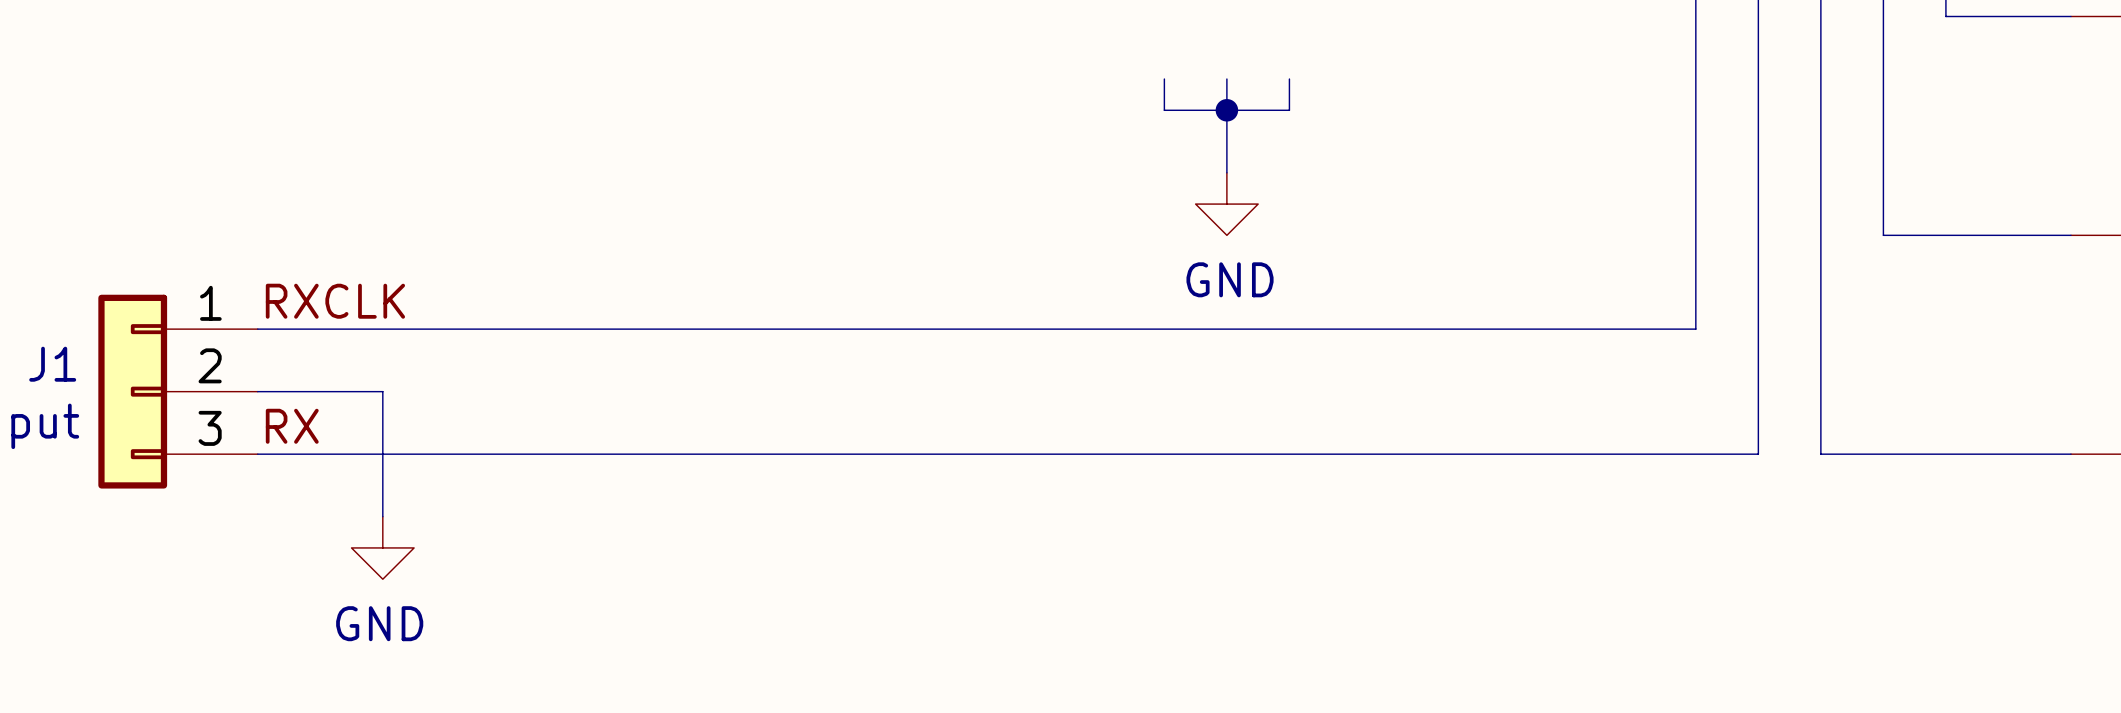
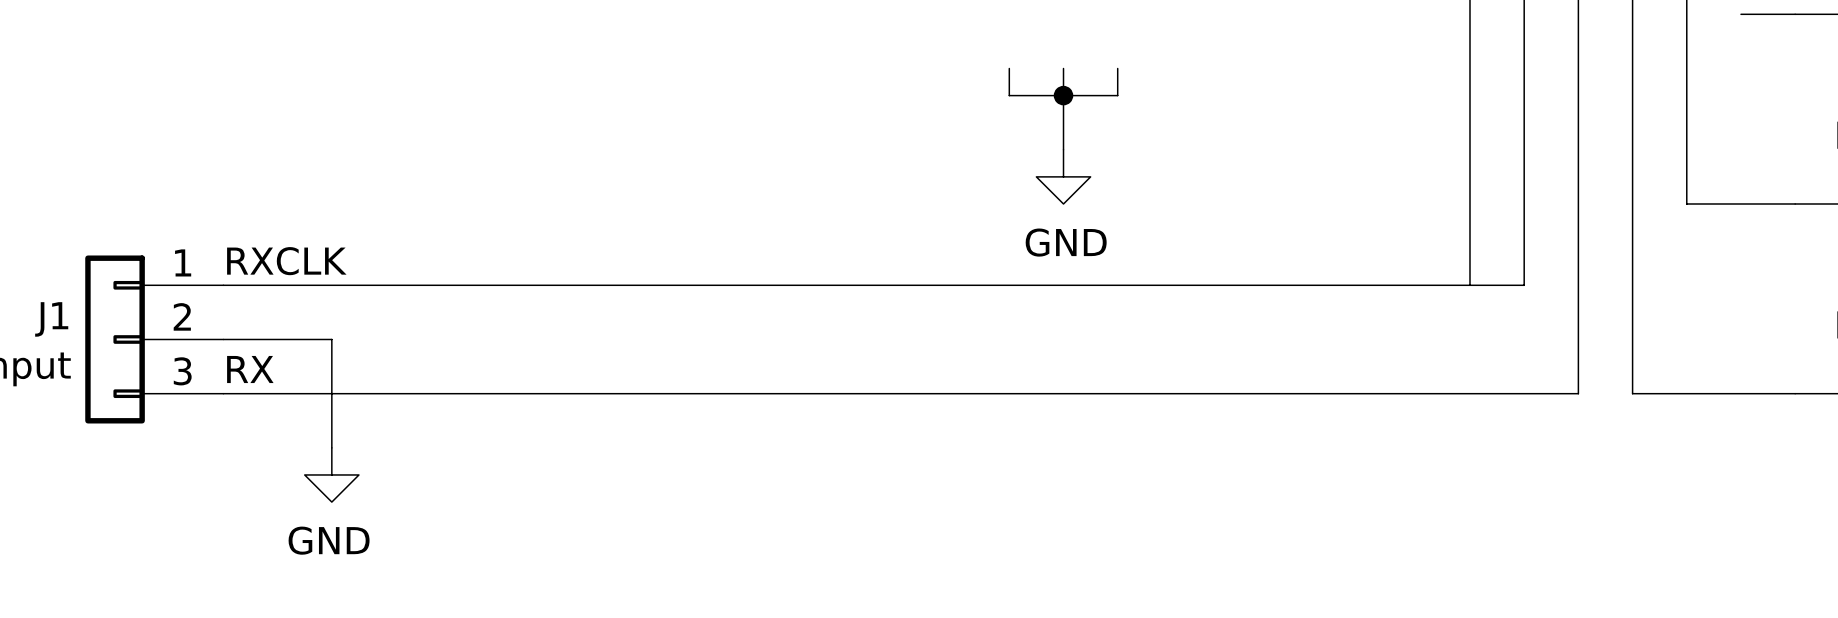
wire: (1945, 16) (2008, 16) -> (1686, 14) (1686, 203)
wire: (1883, 235) (1945, 235) -> (1632, 203) (1632, 393)
wire: (1758, 329) (1758, 454) -> (1524, 285) (1469, 285)
wire: (1820, 454) (1883, 454) -> (1578, 393) (1524, 393)

